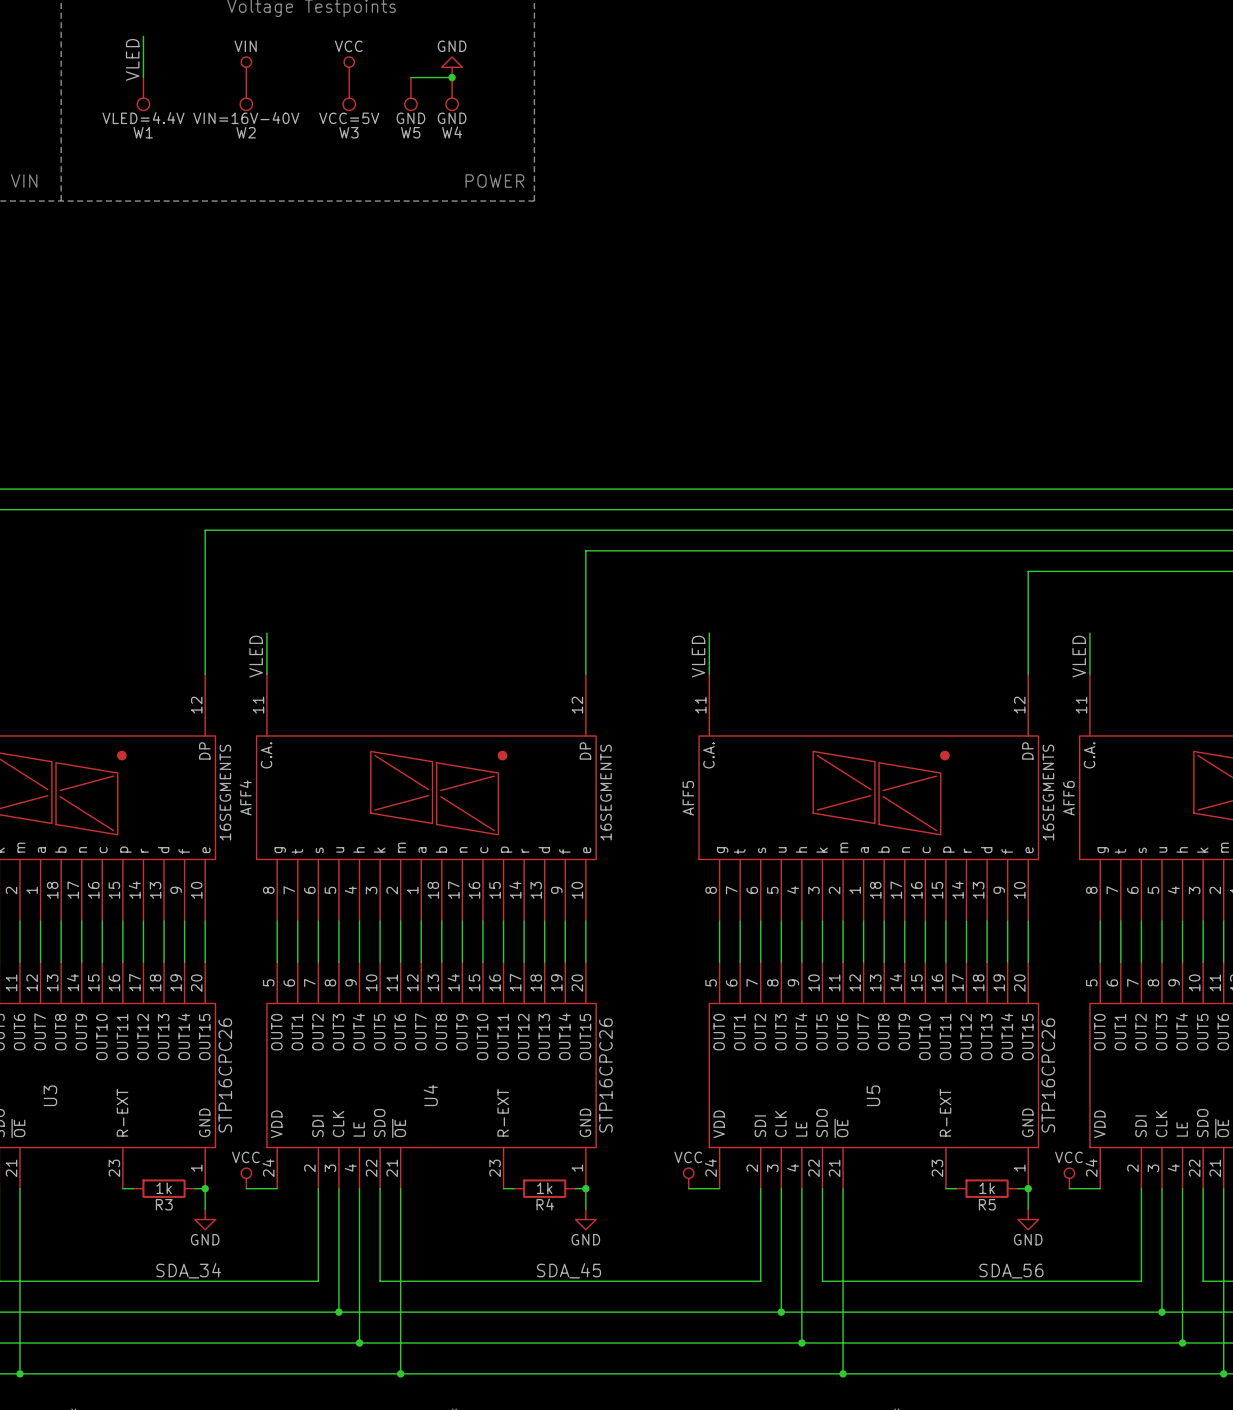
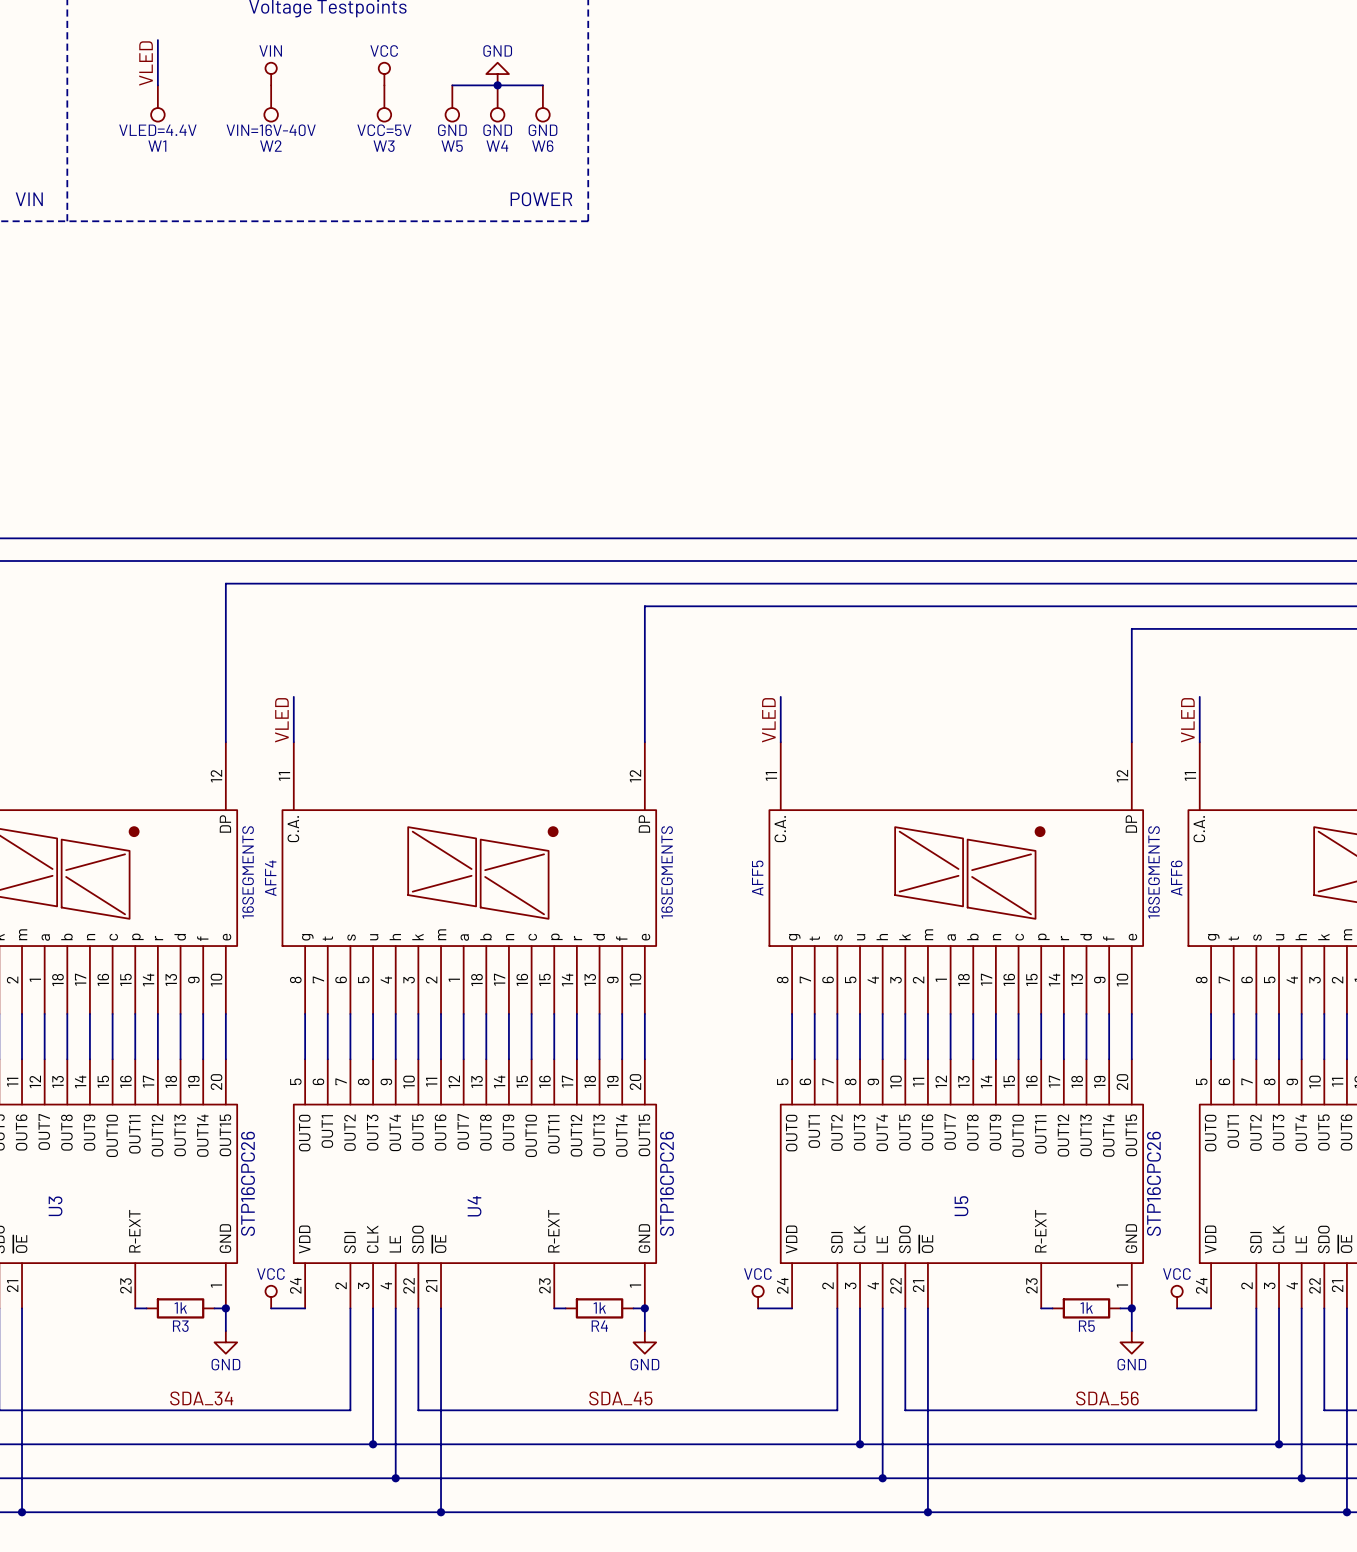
wire: none -> (497, 85) (542, 85)
W6: none -> GND (542, 103)

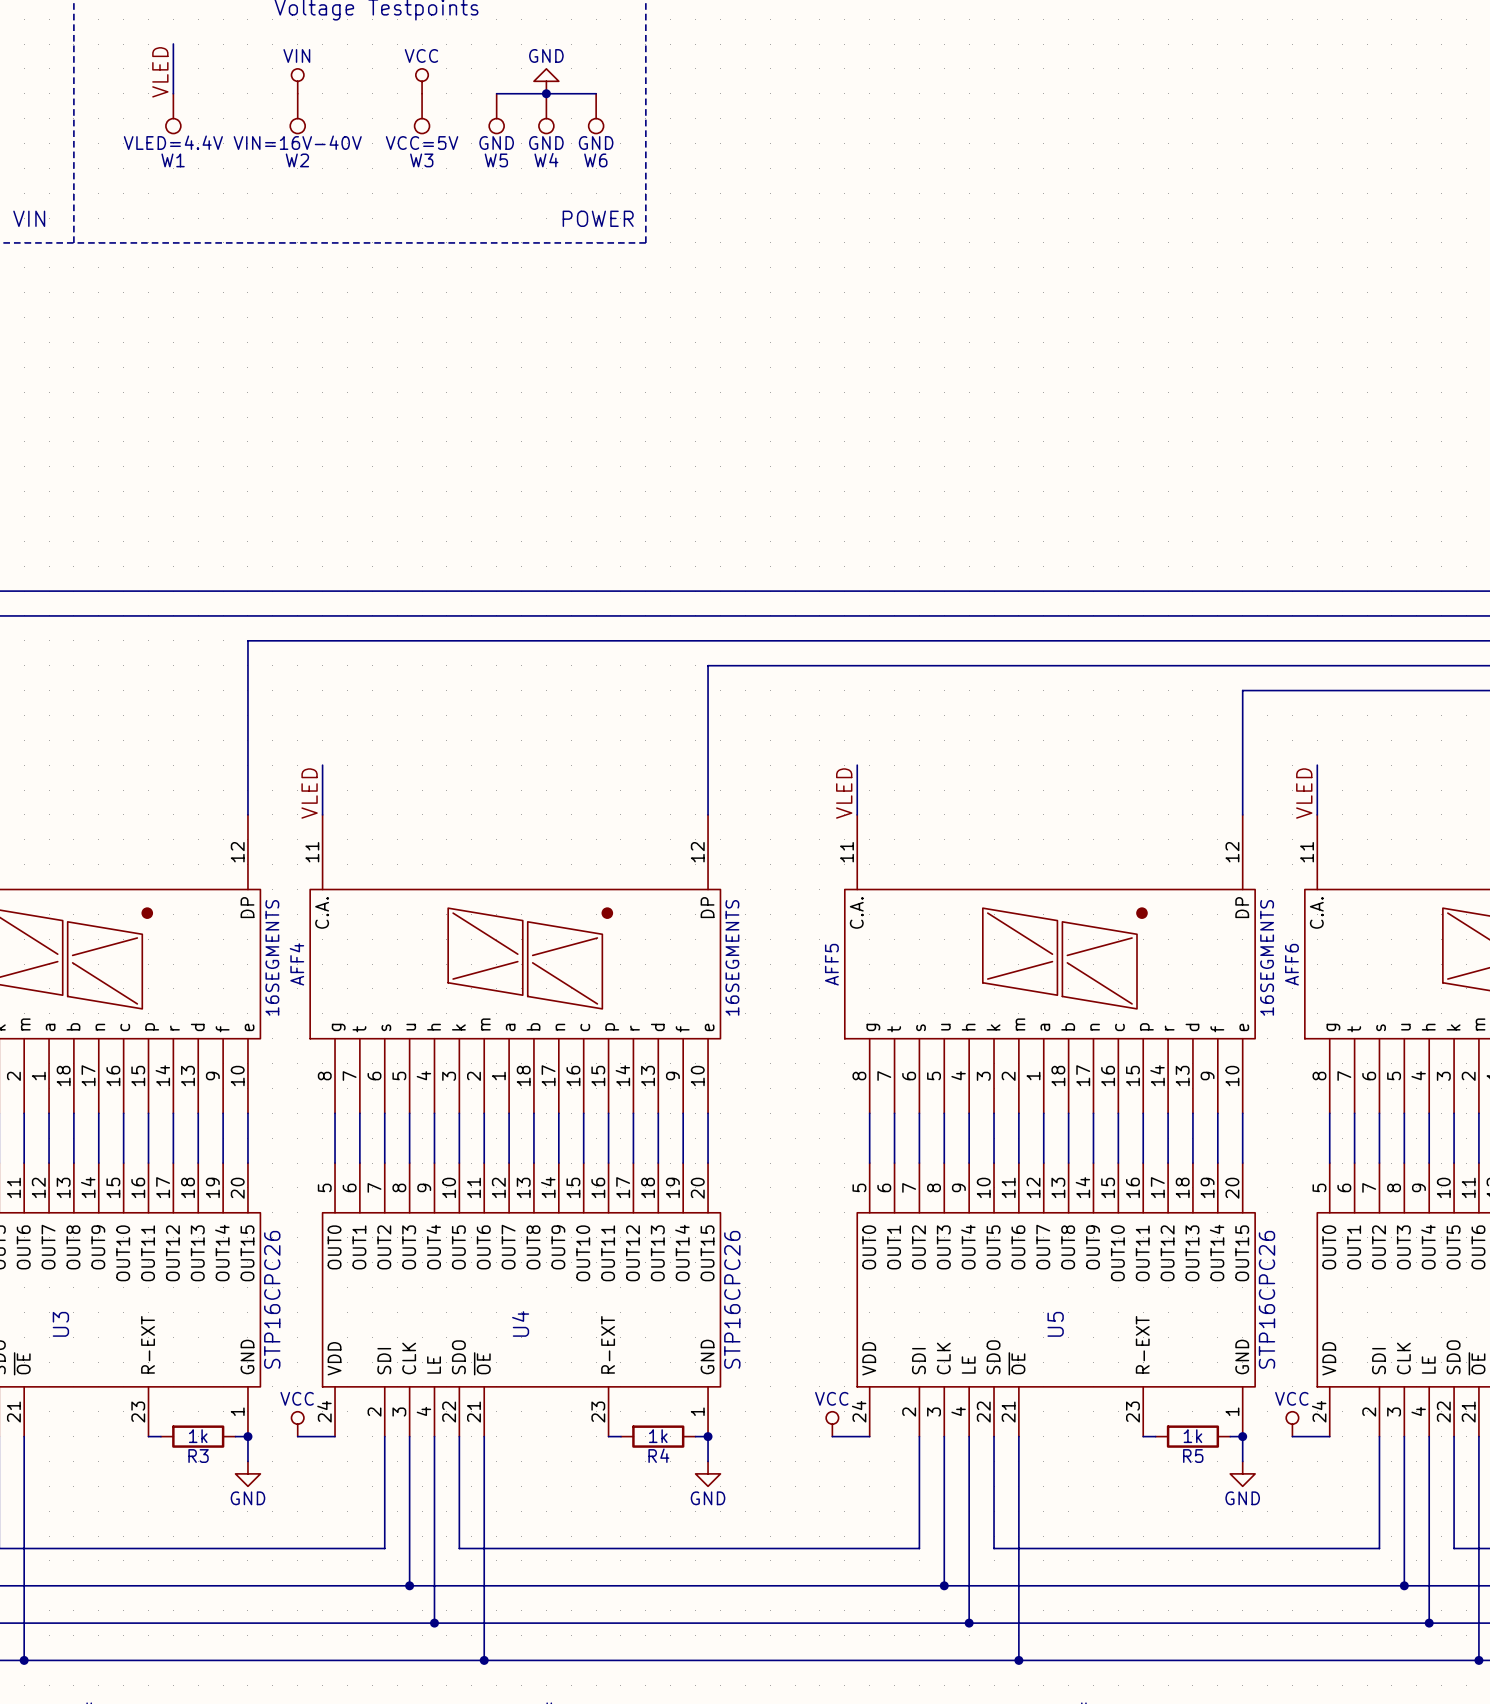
label: SDA_34 (201, 1398) -> none
label: SDA_45 (620, 1398) -> none
label: SDA_56 (1107, 1398) -> none

